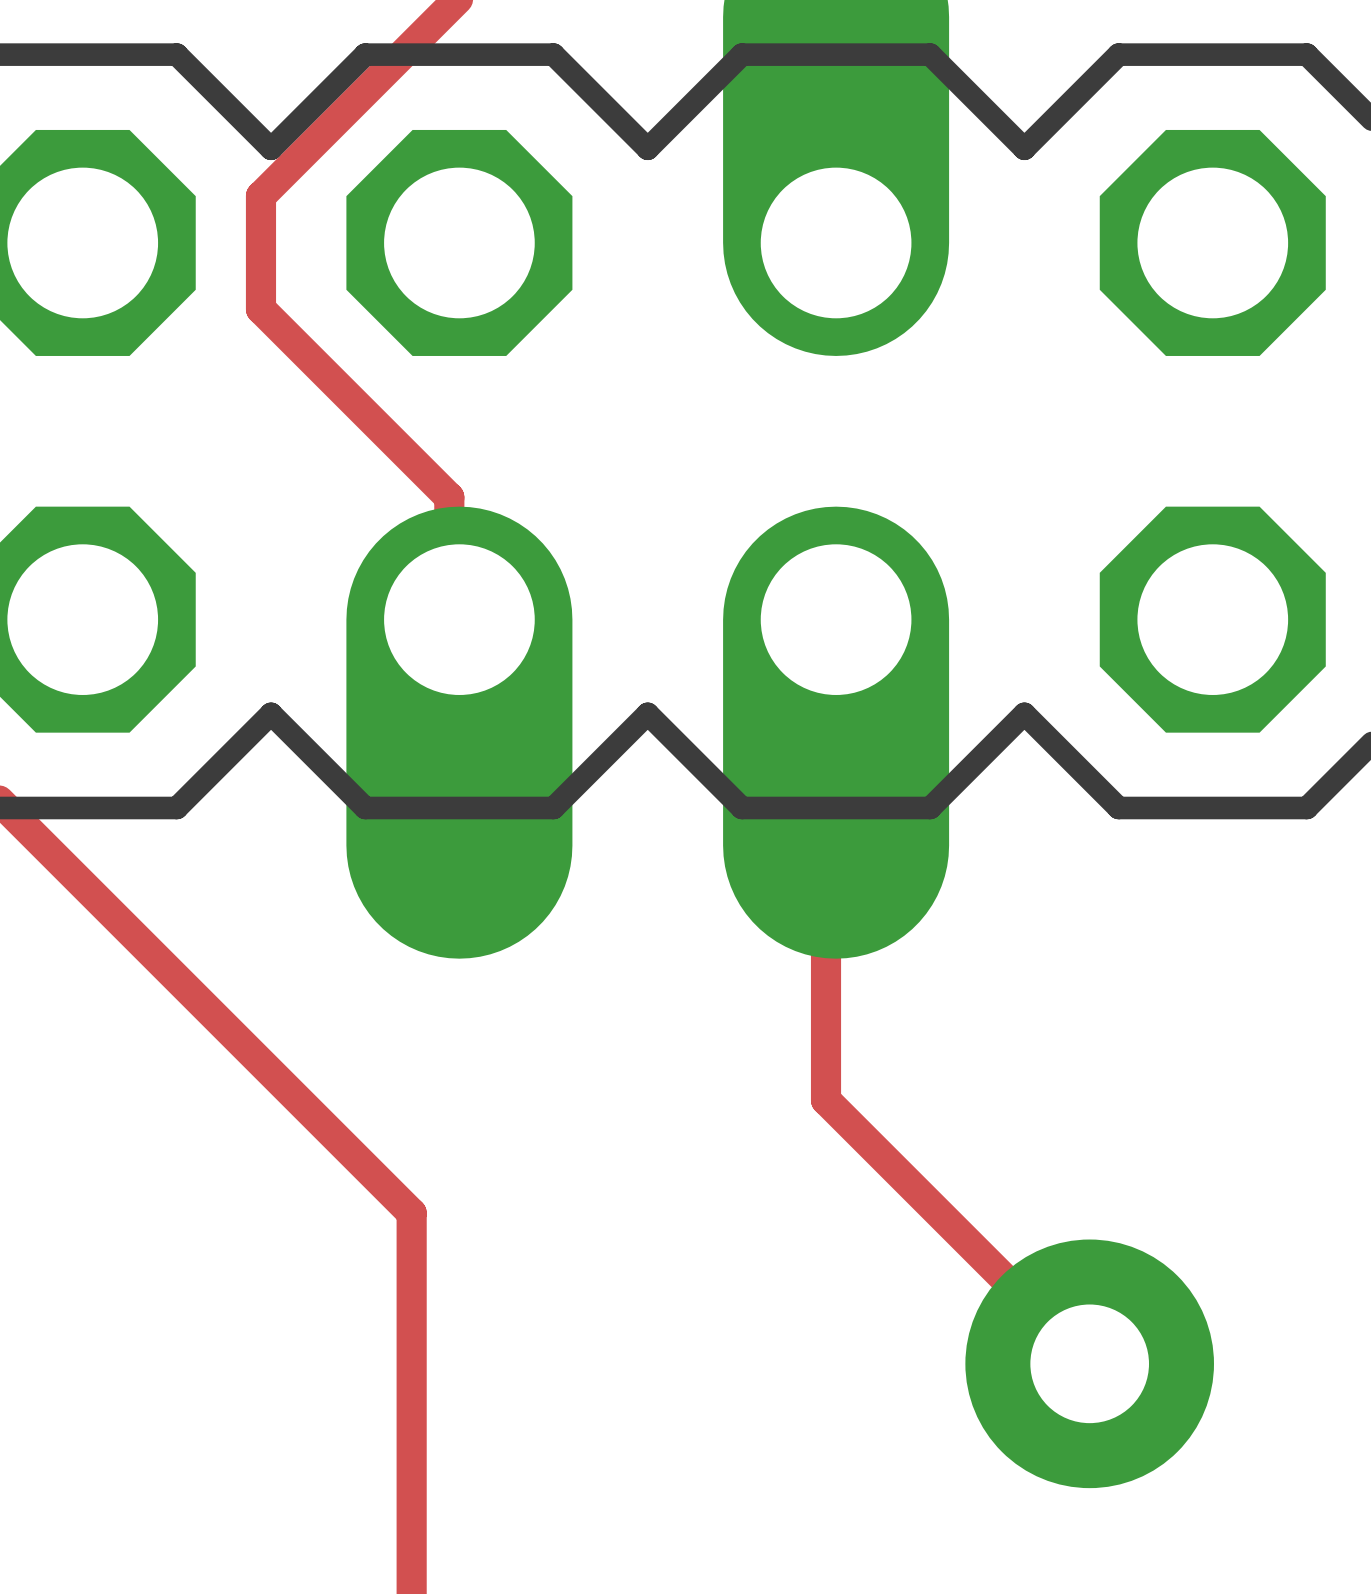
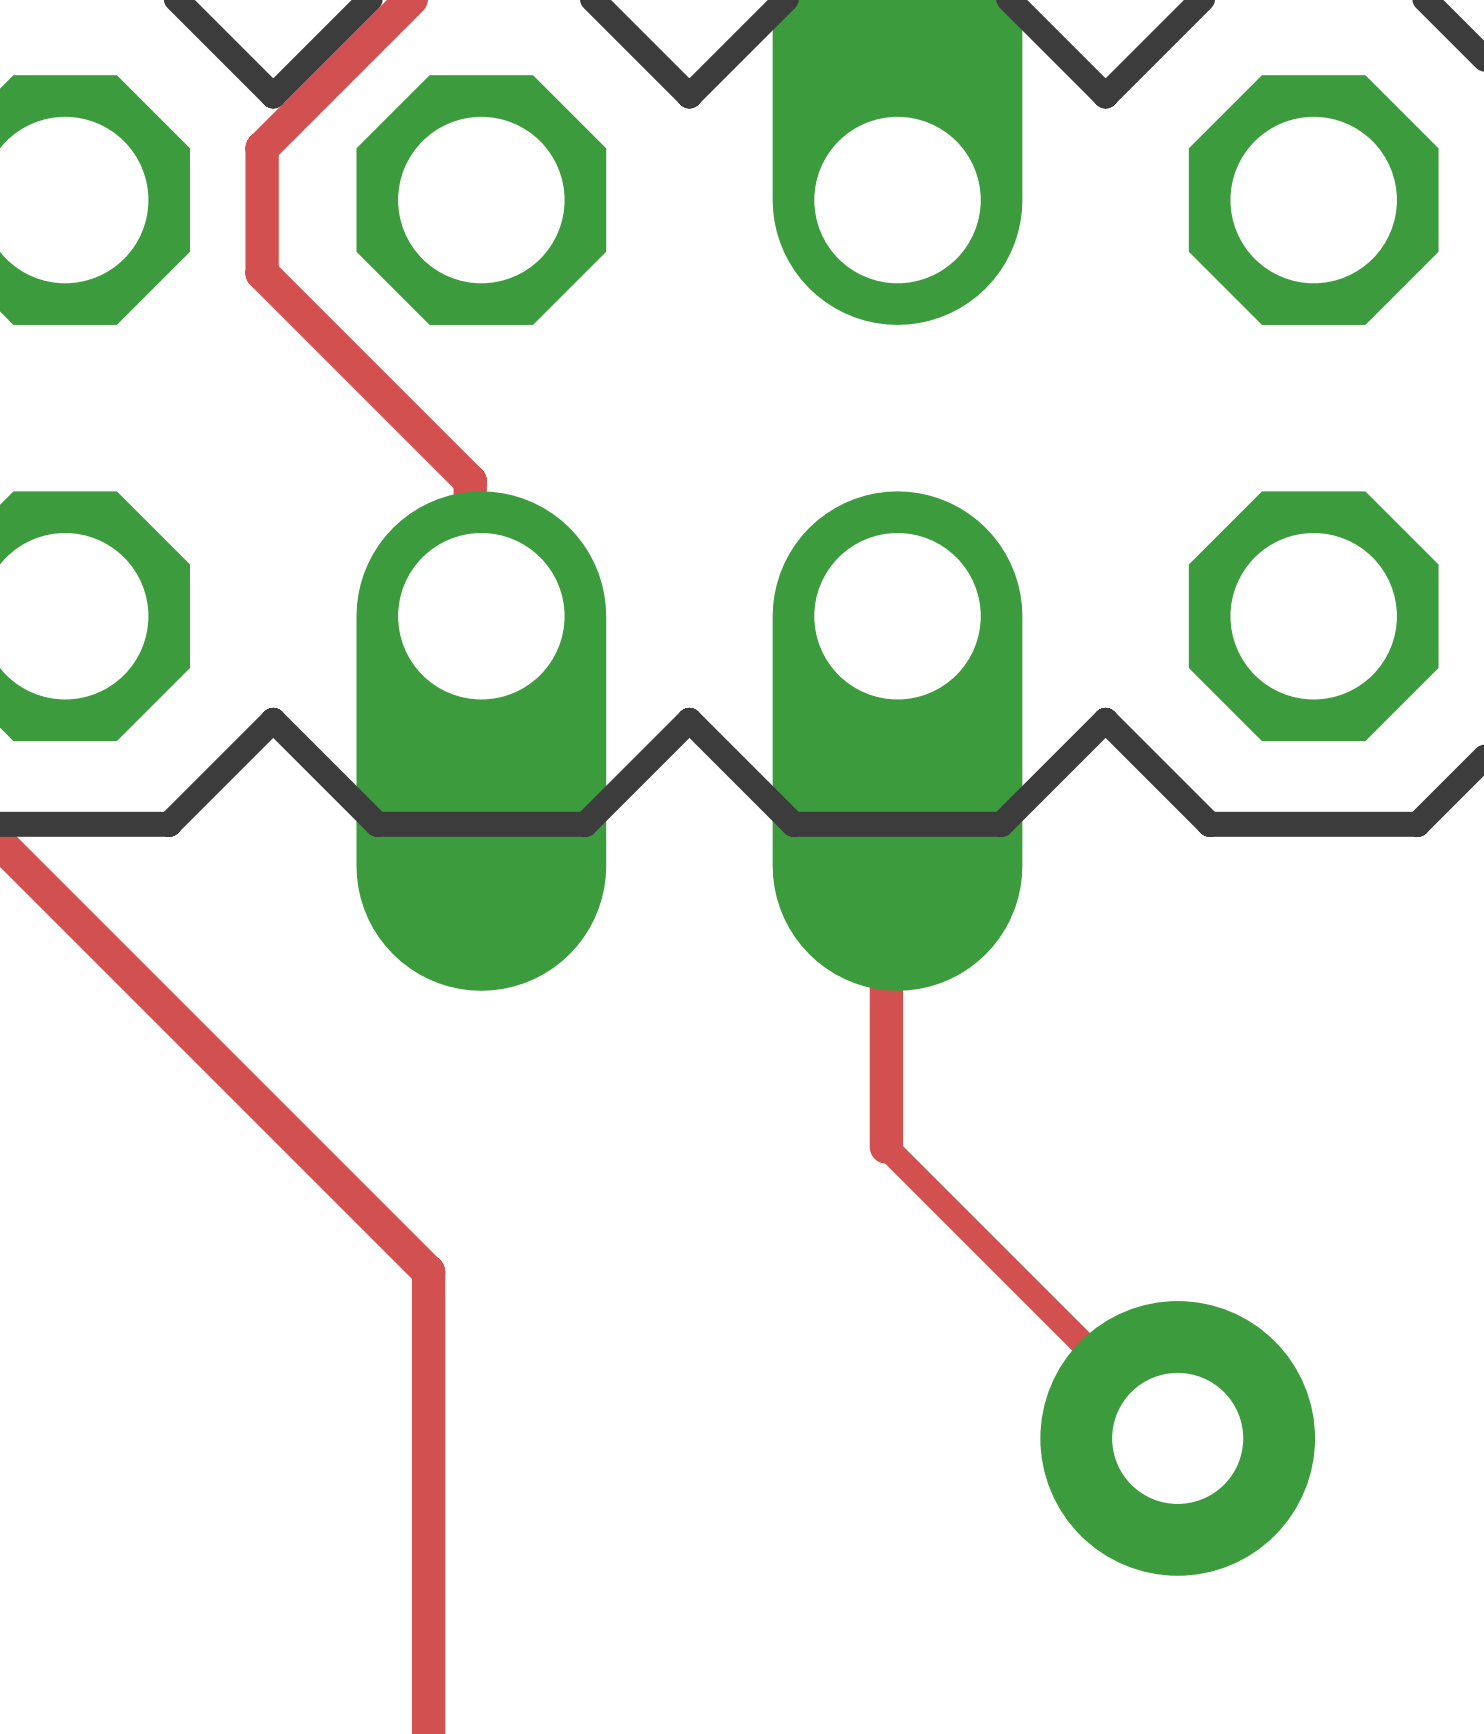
track width: thick (826, 1100) (1089, 1363) -> thin (886, 1147) (1177, 1438)

